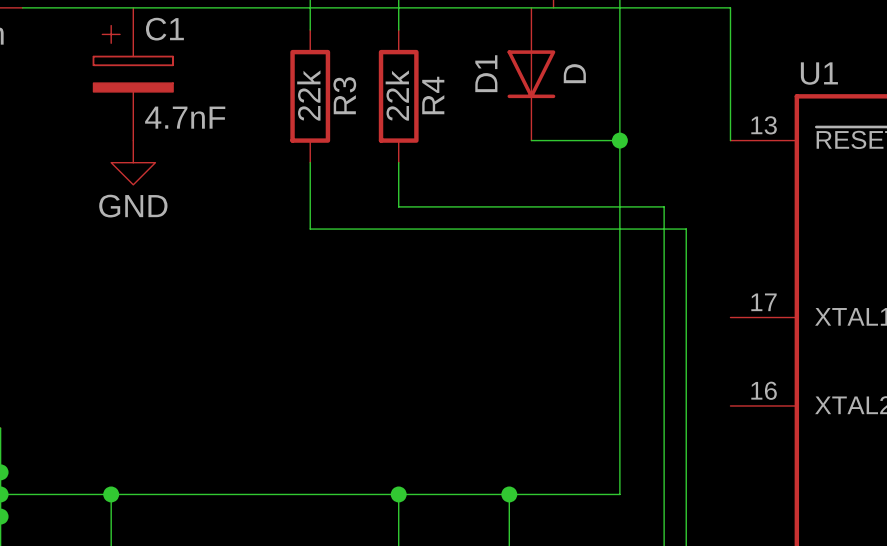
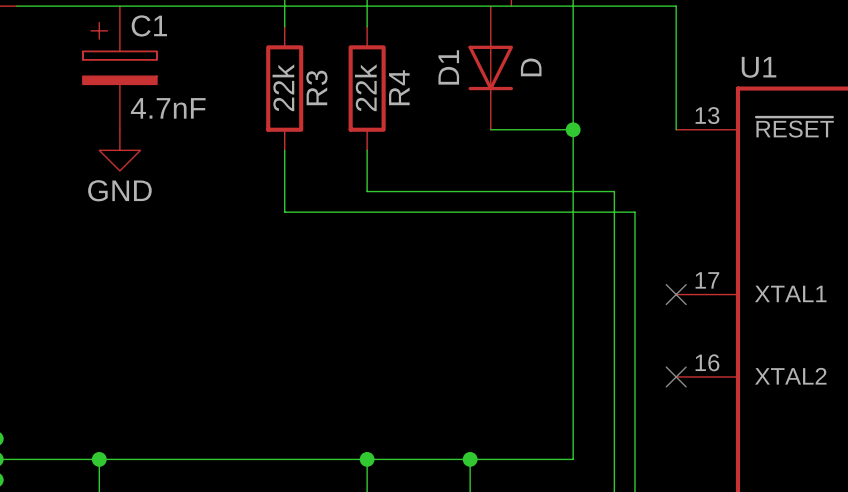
no-connect mark: none -> (676, 294)
no-connect mark: none -> (676, 376)

